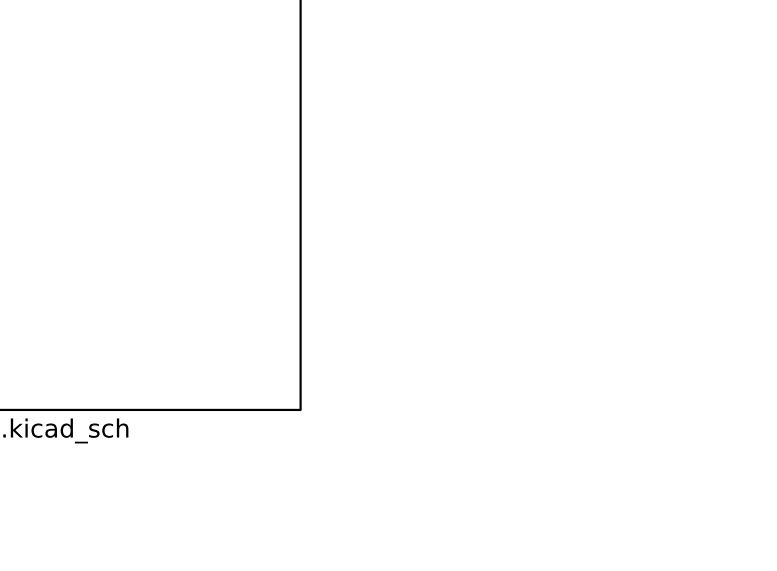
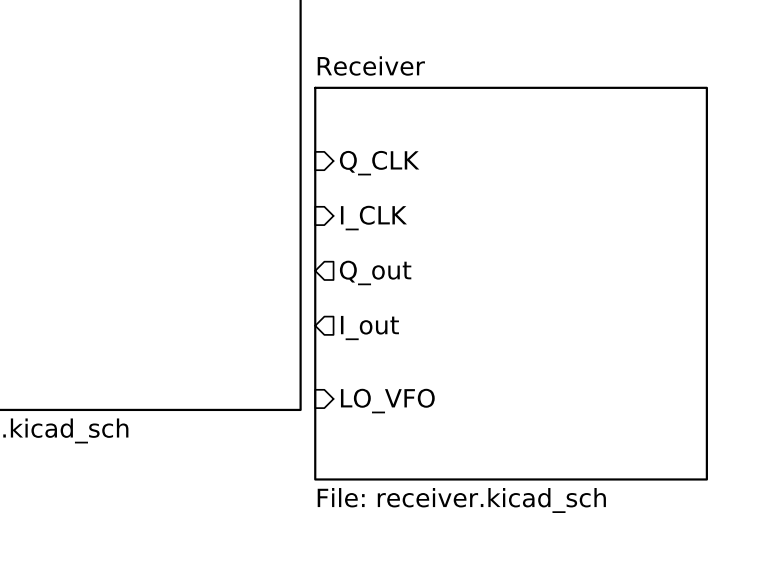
sheet pin: none -> Q_CLK (379, 163)
sheet pin: none -> I_CLK (373, 218)
sheet pin: none -> Q_out (375, 272)
sheet Receiver: none -> File: receiver.kicad_sch (511, 283)
sheet pin: none -> I_out (369, 328)
sheet pin: none -> LO_VFO (387, 401)

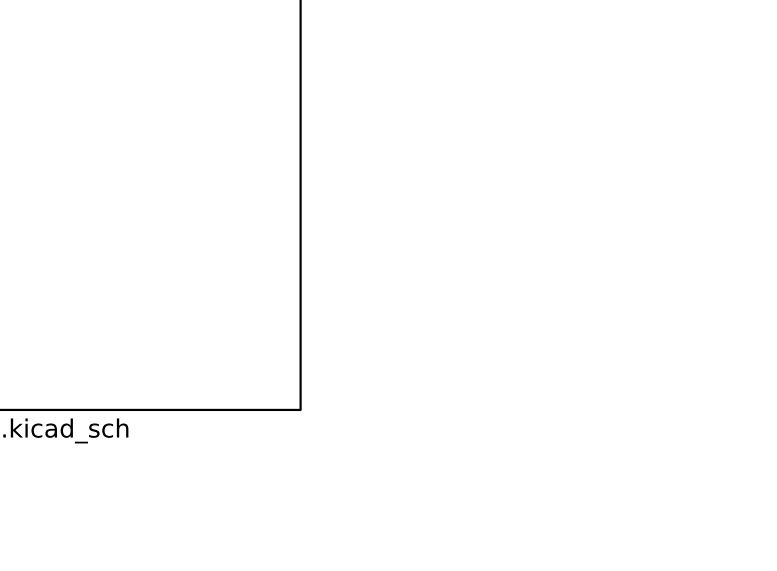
sheet pin: Q_CLK (379, 163) -> none
sheet pin: I_CLK (373, 218) -> none
sheet pin: Q_out (375, 272) -> none
sheet Receiver: File: receiver.kicad_sch (511, 283) -> none
sheet pin: I_out (369, 328) -> none
sheet pin: LO_VFO (387, 401) -> none

